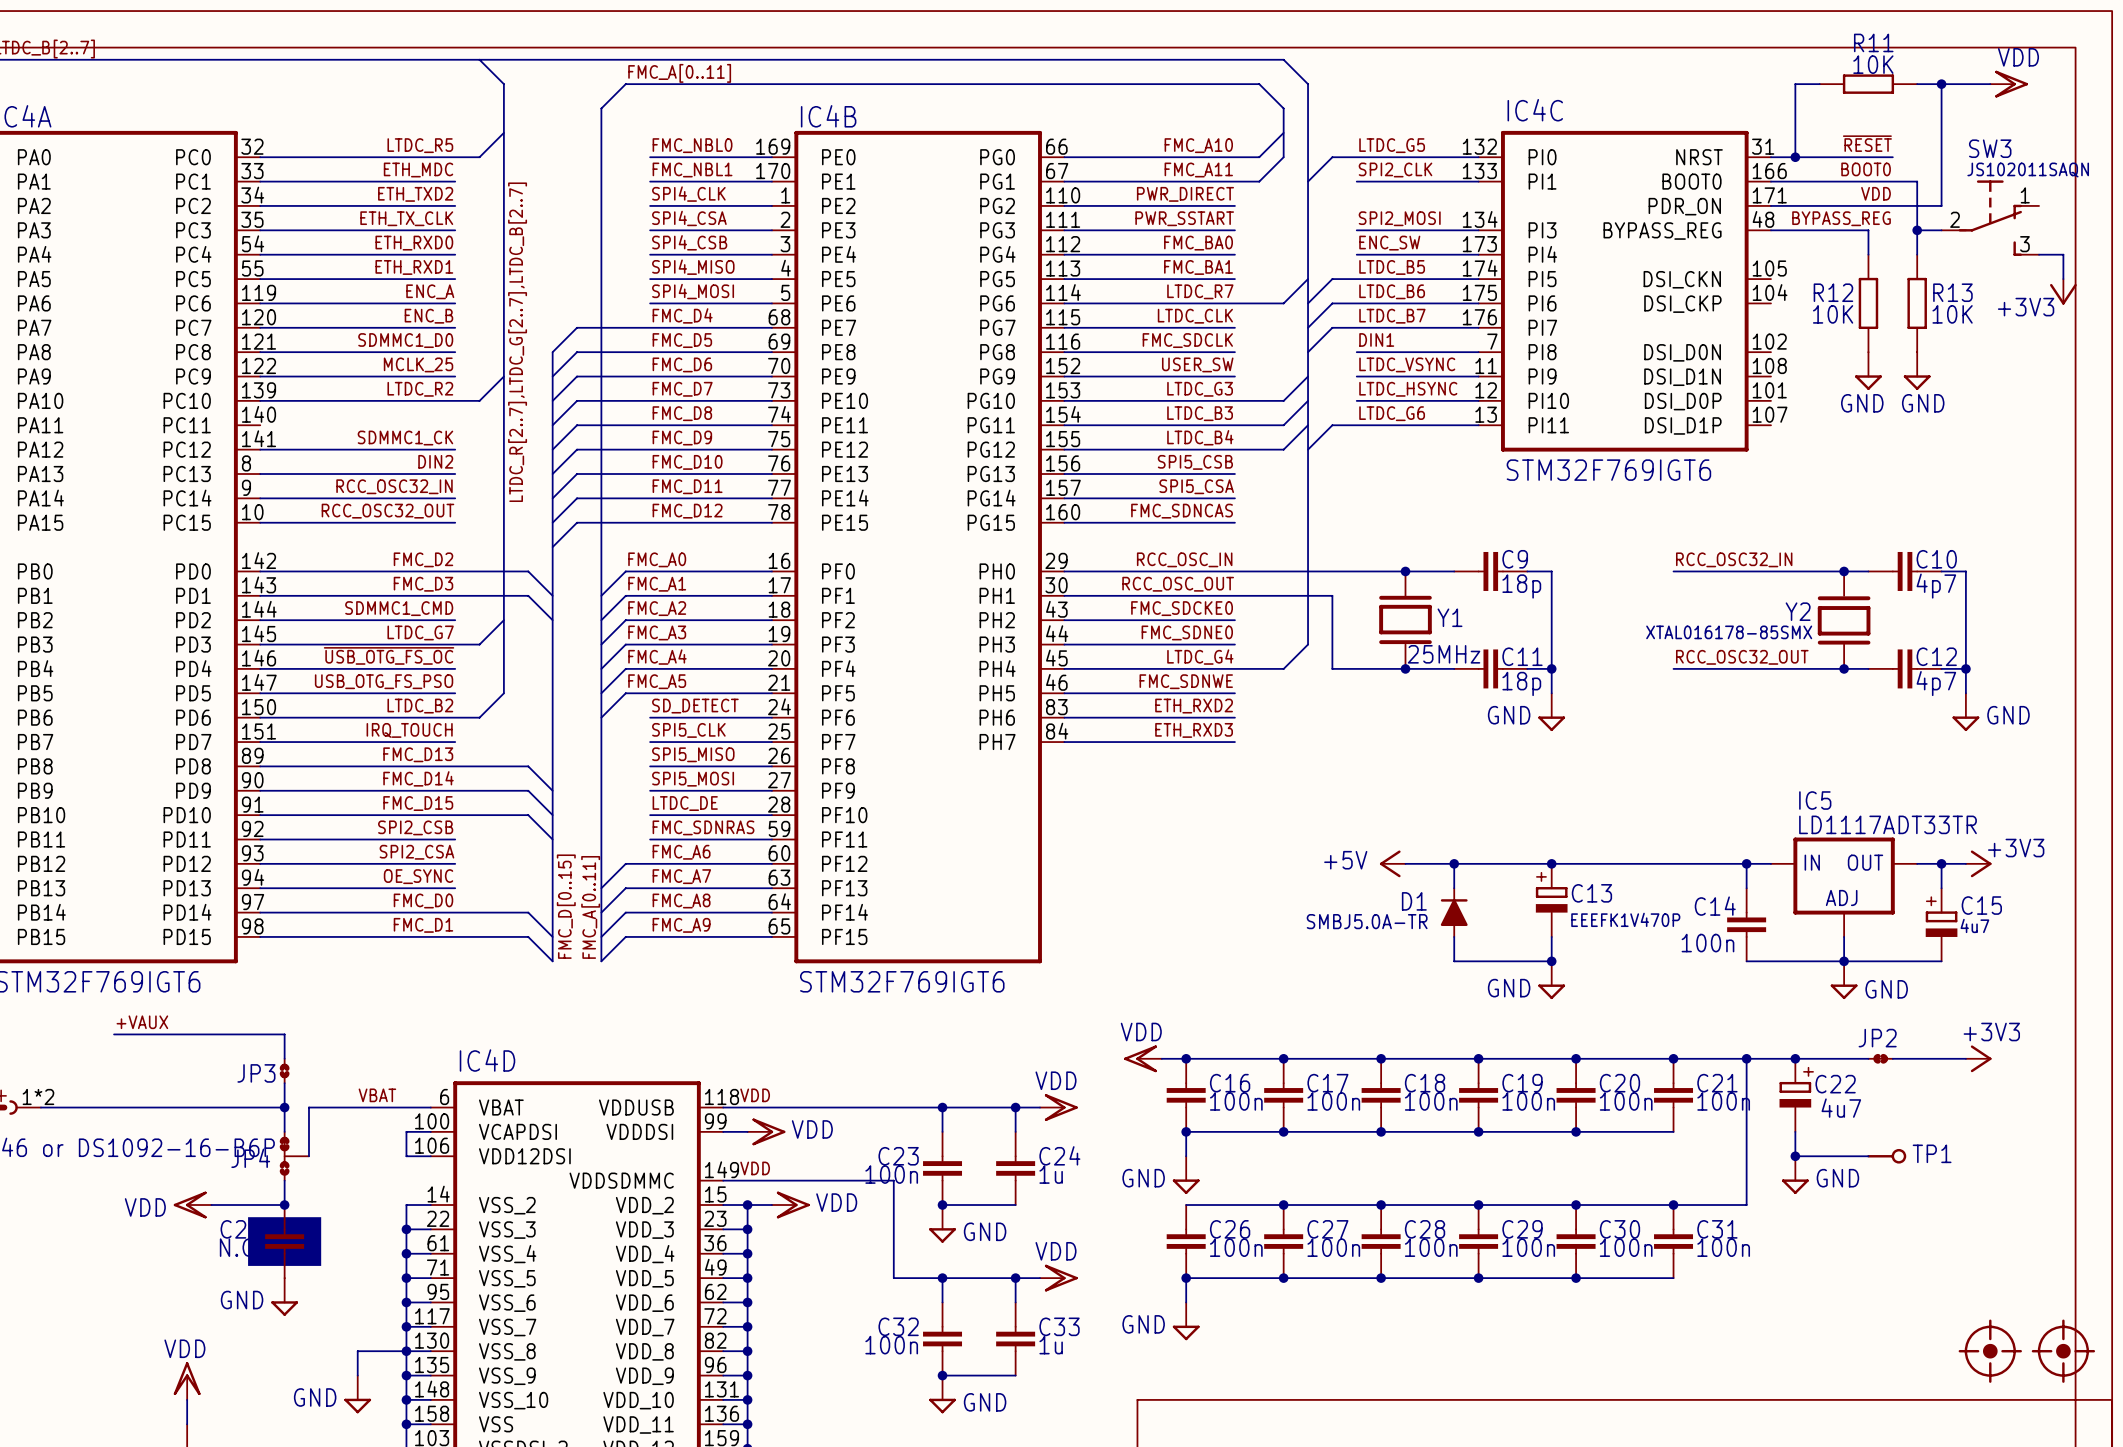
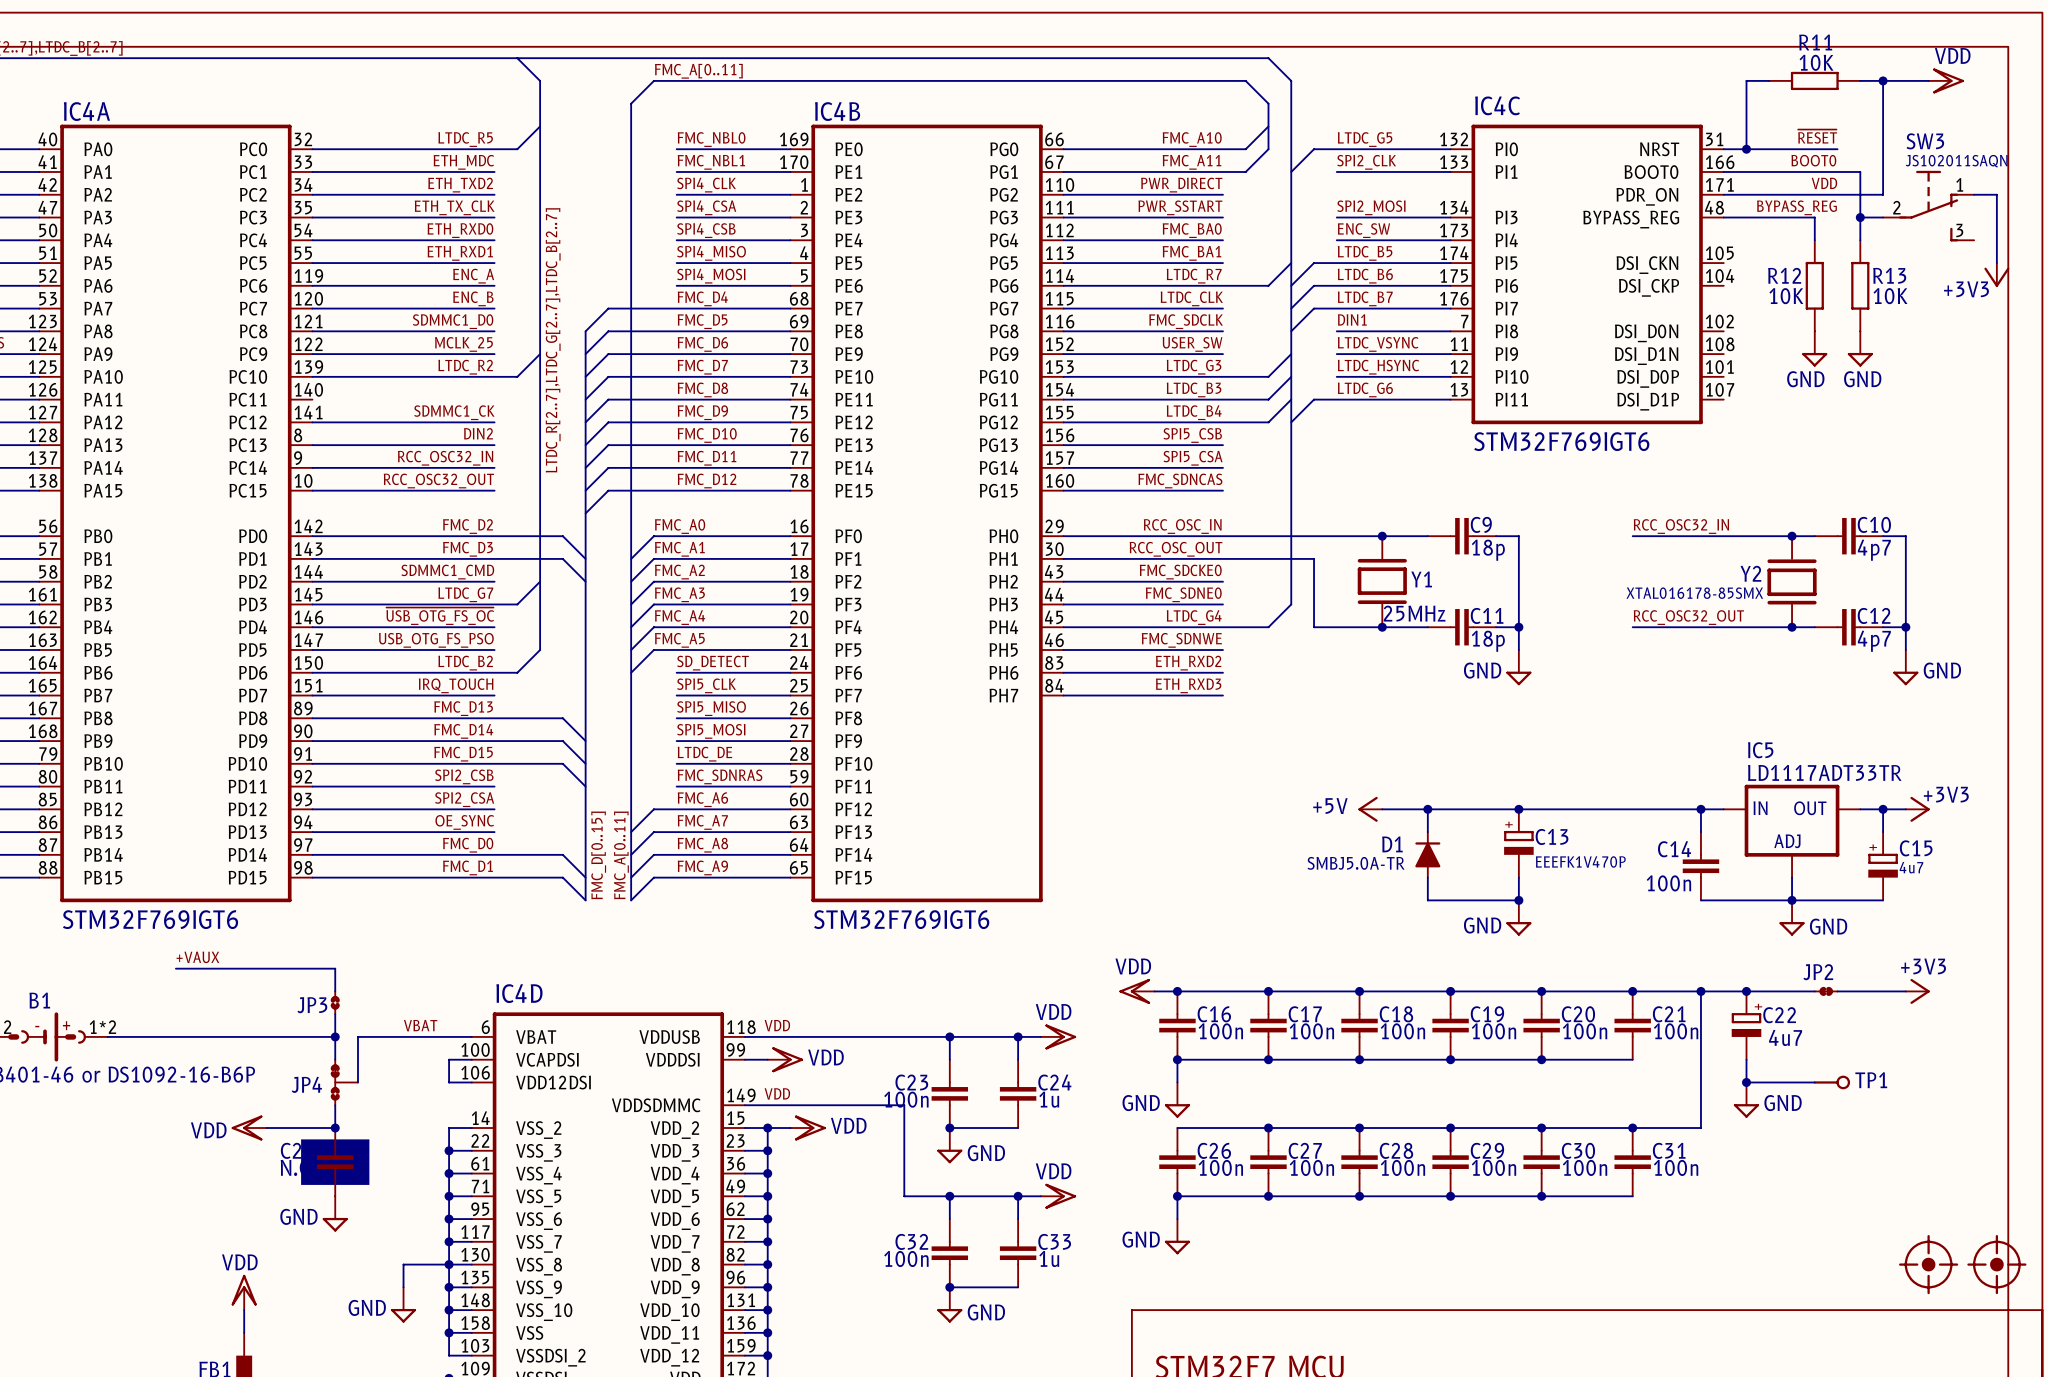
wire: (2039, 254) (2063, 254) -> (1974, 194) (1996, 194) (1996, 240)

